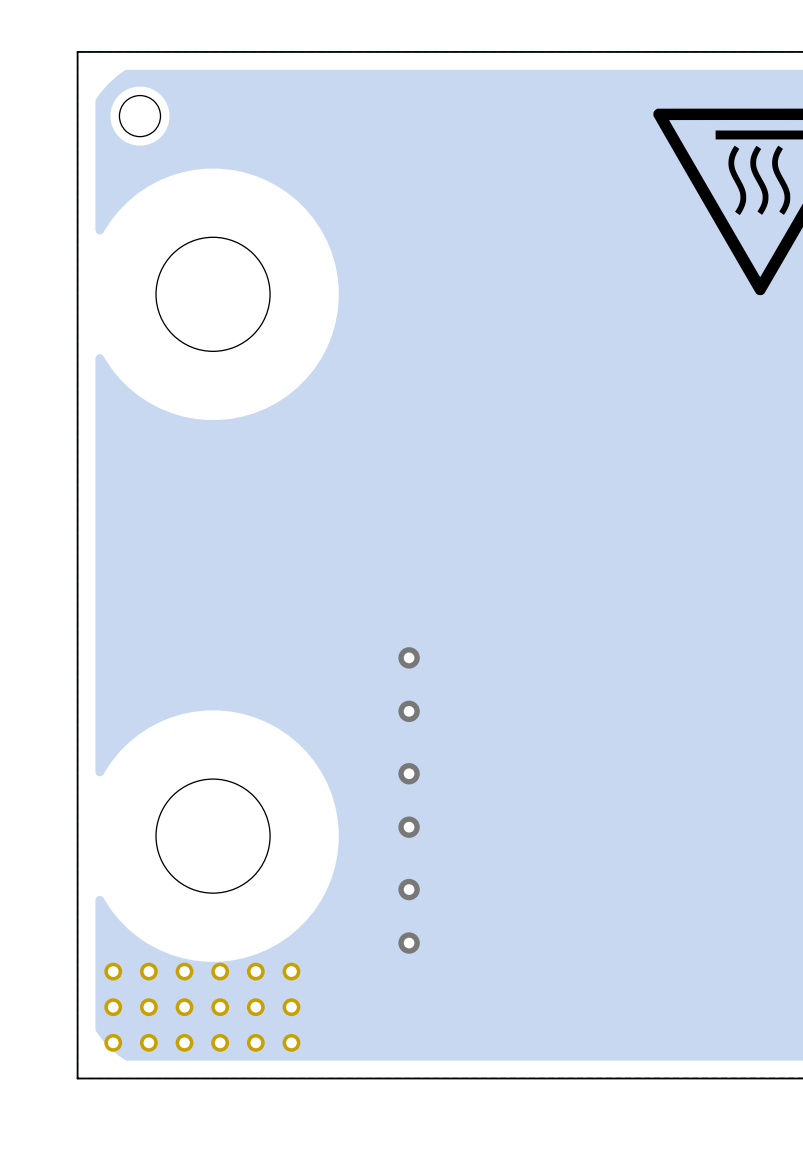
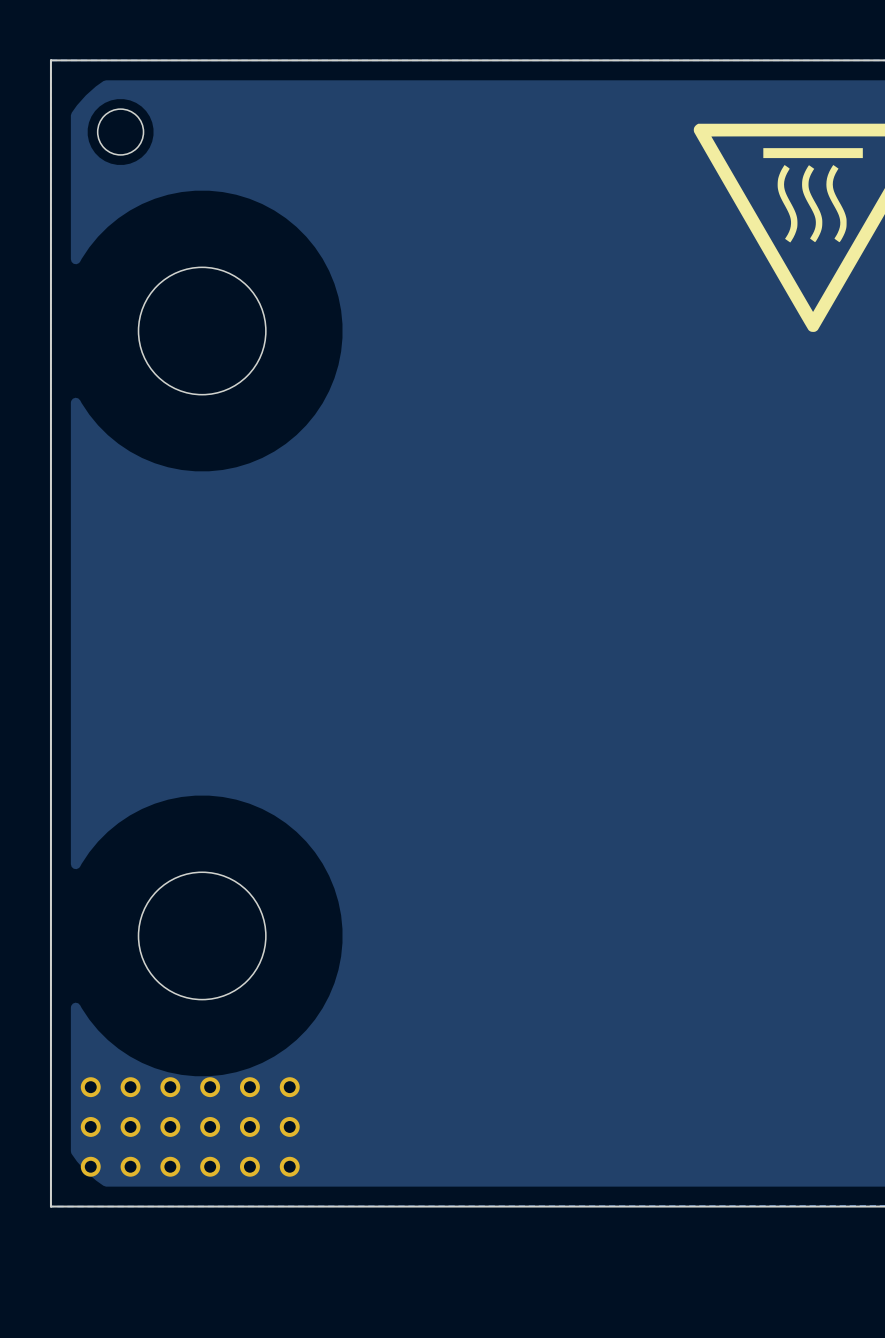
via: (409, 657) -> none
via: (409, 711) -> none
via: (409, 773) -> none
via: (409, 827) -> none
via: (409, 889) -> none
via: (409, 943) -> none

